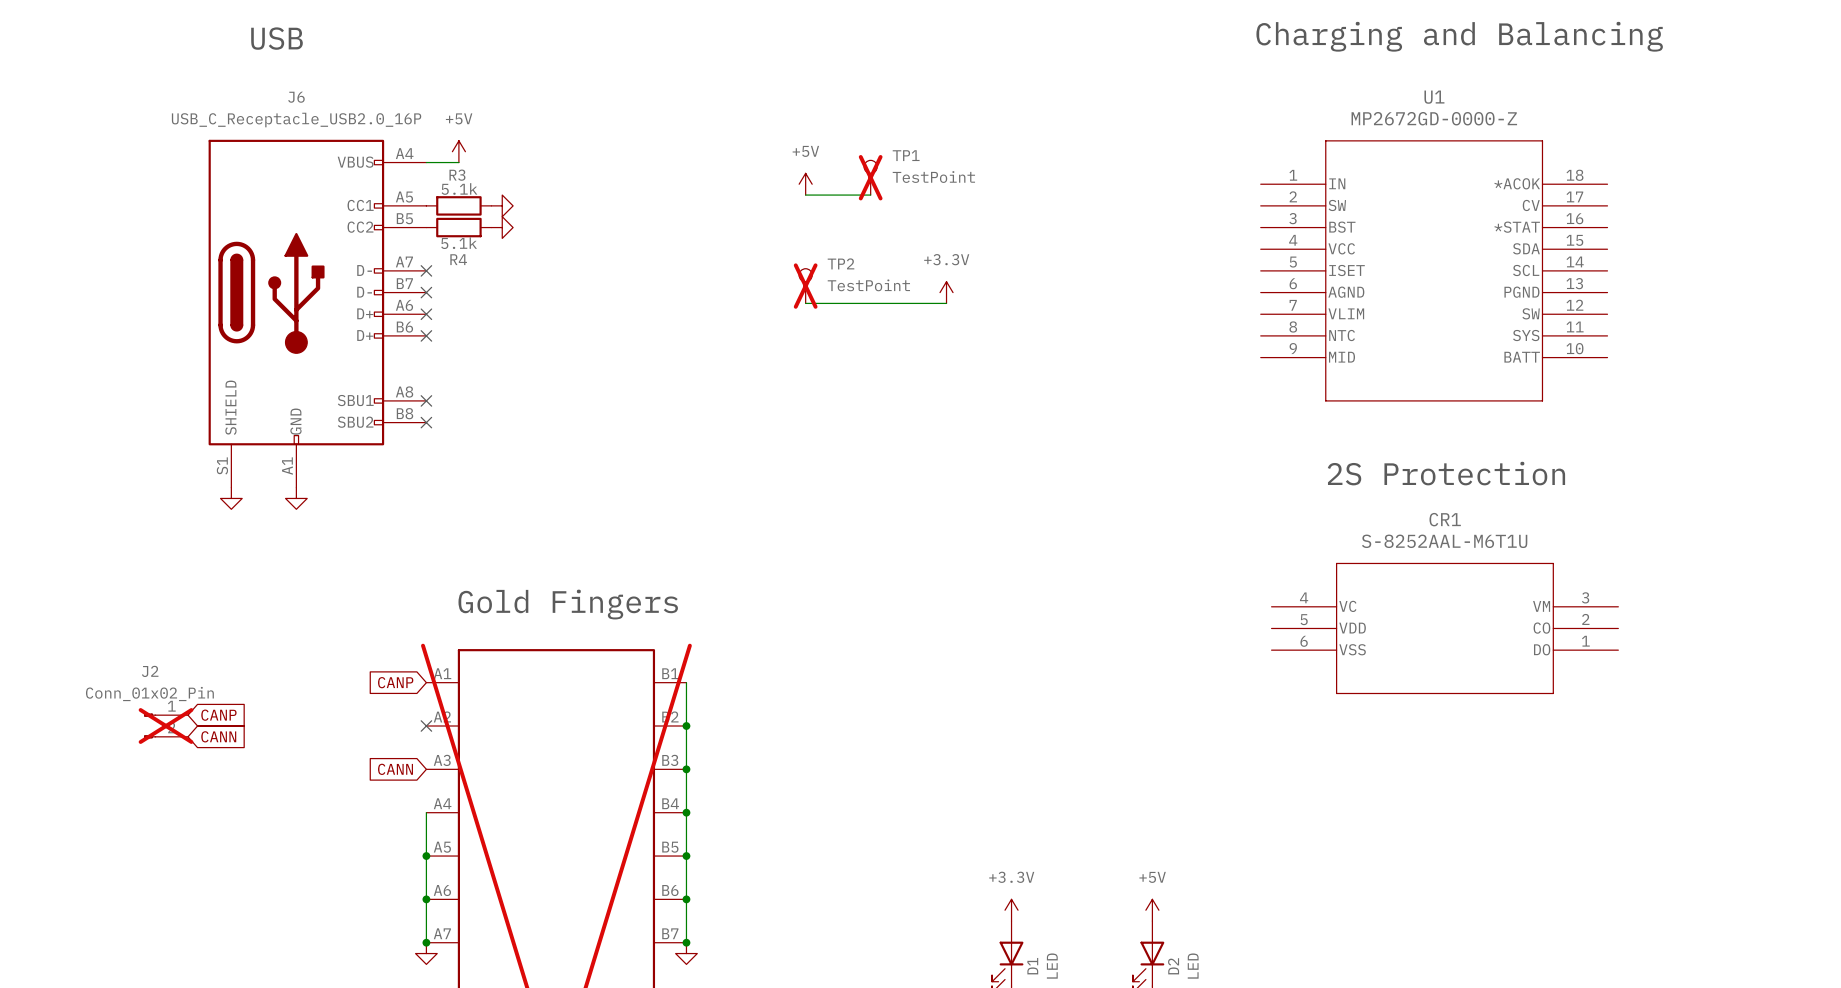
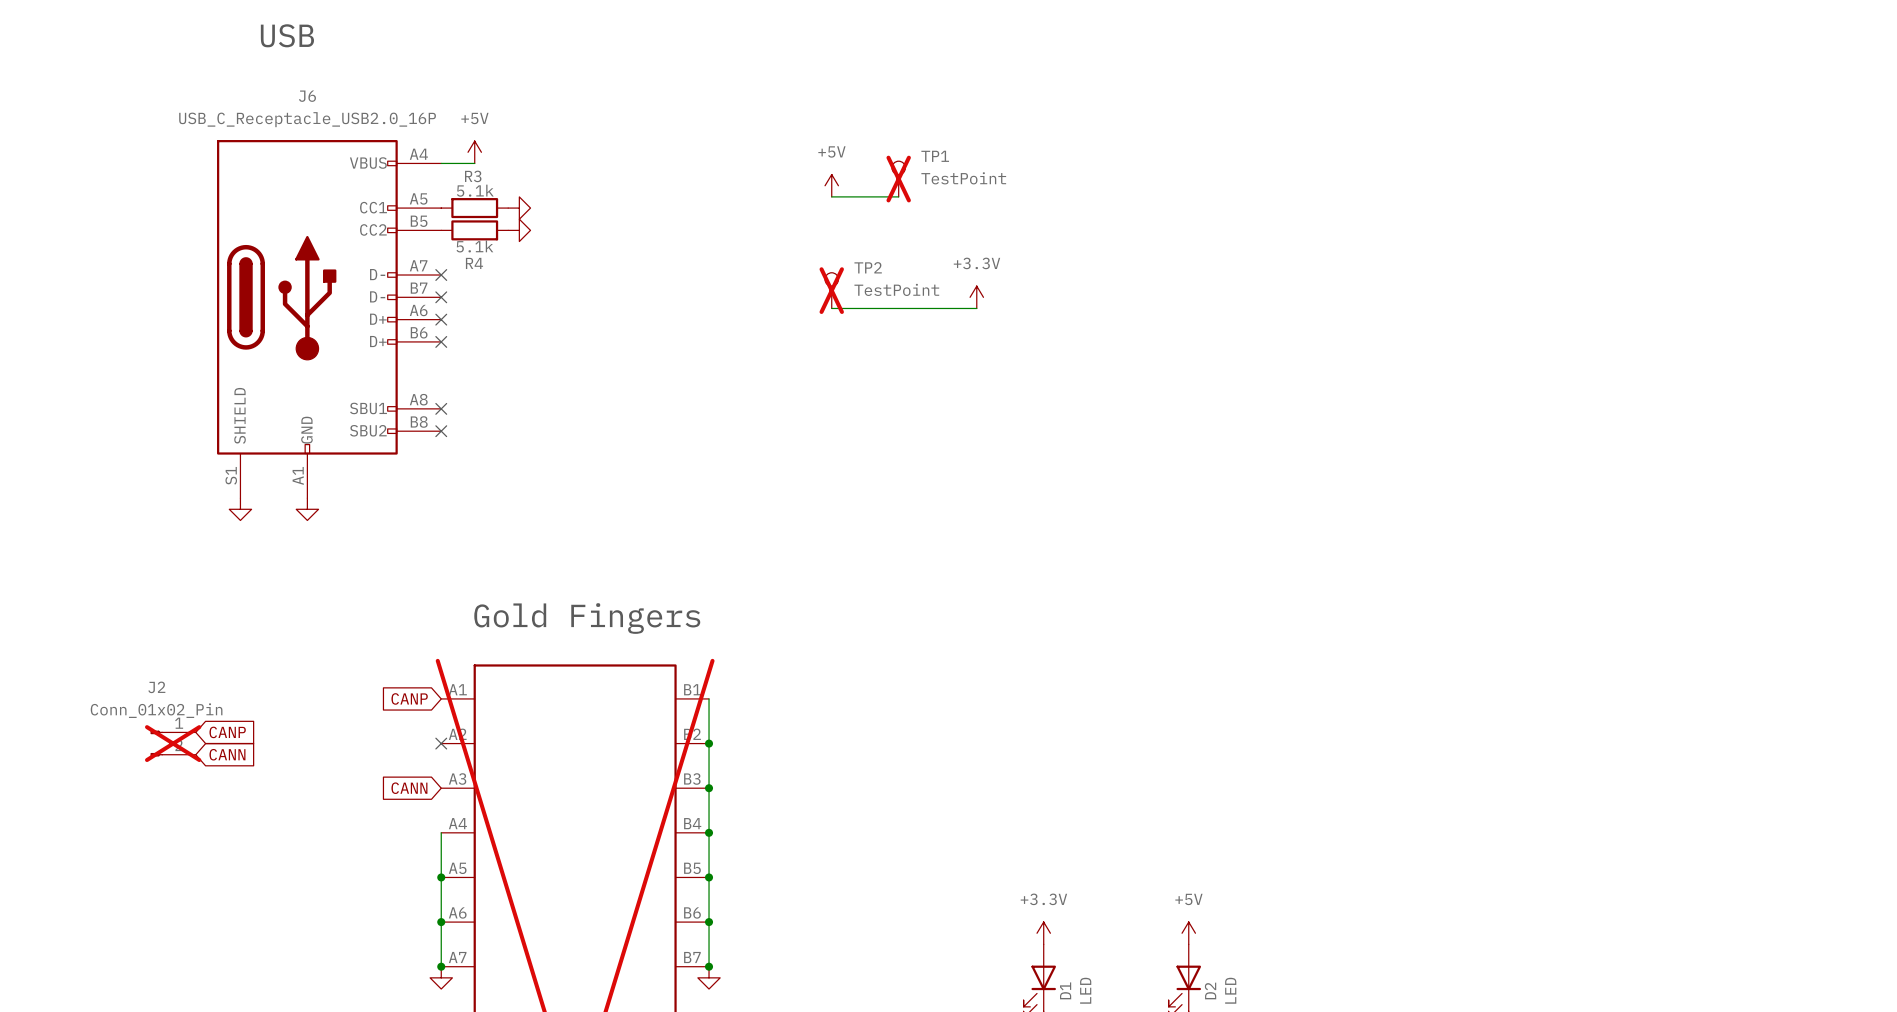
text: Charging and Balancing (1459, 36) -> none
U1: MP2672GD-0000-Z (1434, 270) -> none
text: 2S Protection (1446, 473) -> none
CR1: S-8252AAL-M6T1U (1444, 628) -> none

